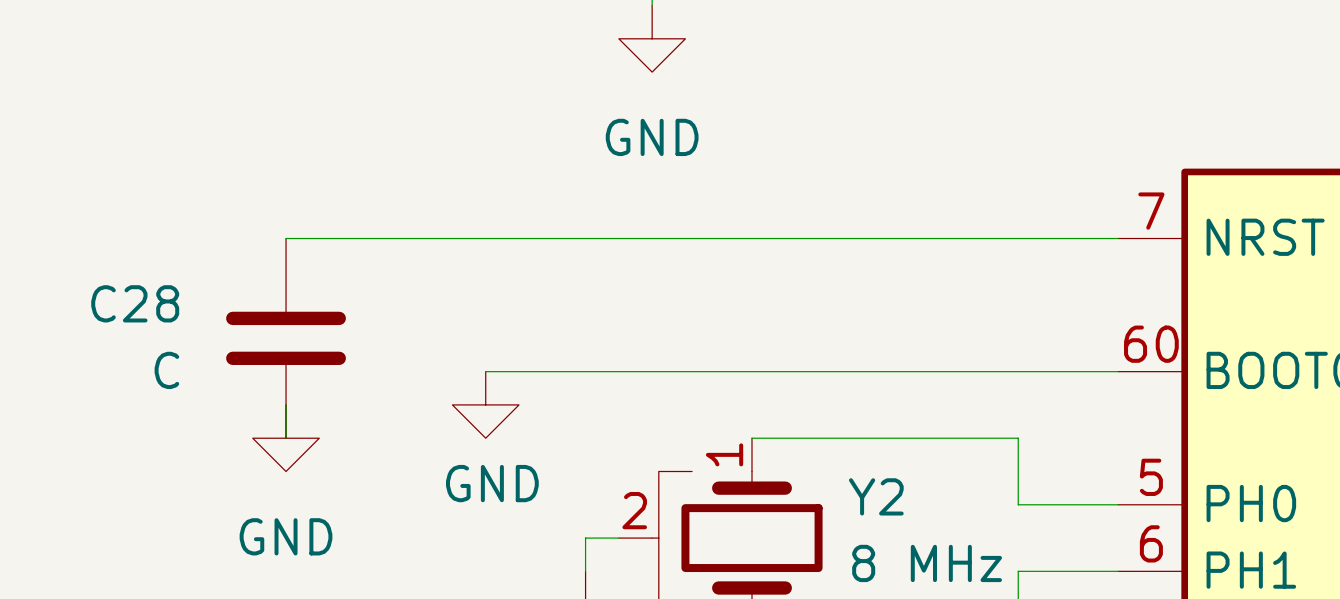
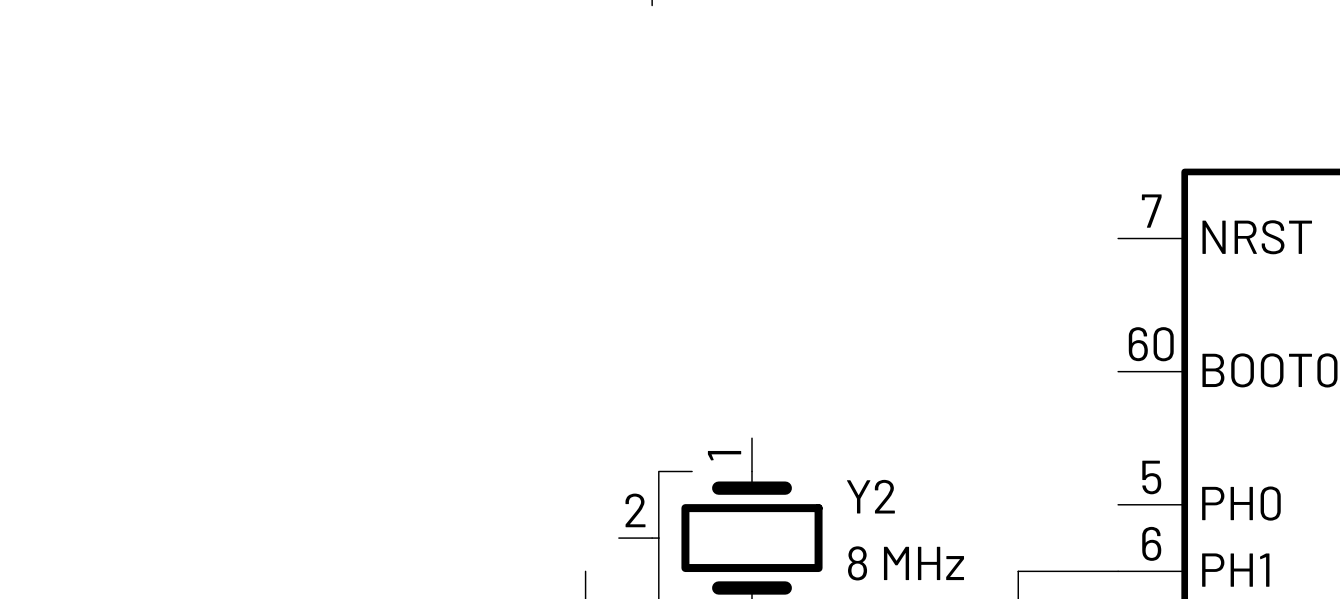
power symbol: GND (652, 38) -> none
wire: (286, 238) (1118, 238) -> none
C28: C (286, 338) -> none
wire: (485, 371) (1118, 371) -> none
wire: (286, 404) (286, 438) -> none
power symbol: GND (485, 404) -> none
power symbol: GND (286, 438) -> none
wire: (751, 438) (1018, 438) (1018, 504) (1118, 504) -> none
wire: (618, 538) (585, 538) (585, 571) -> none

